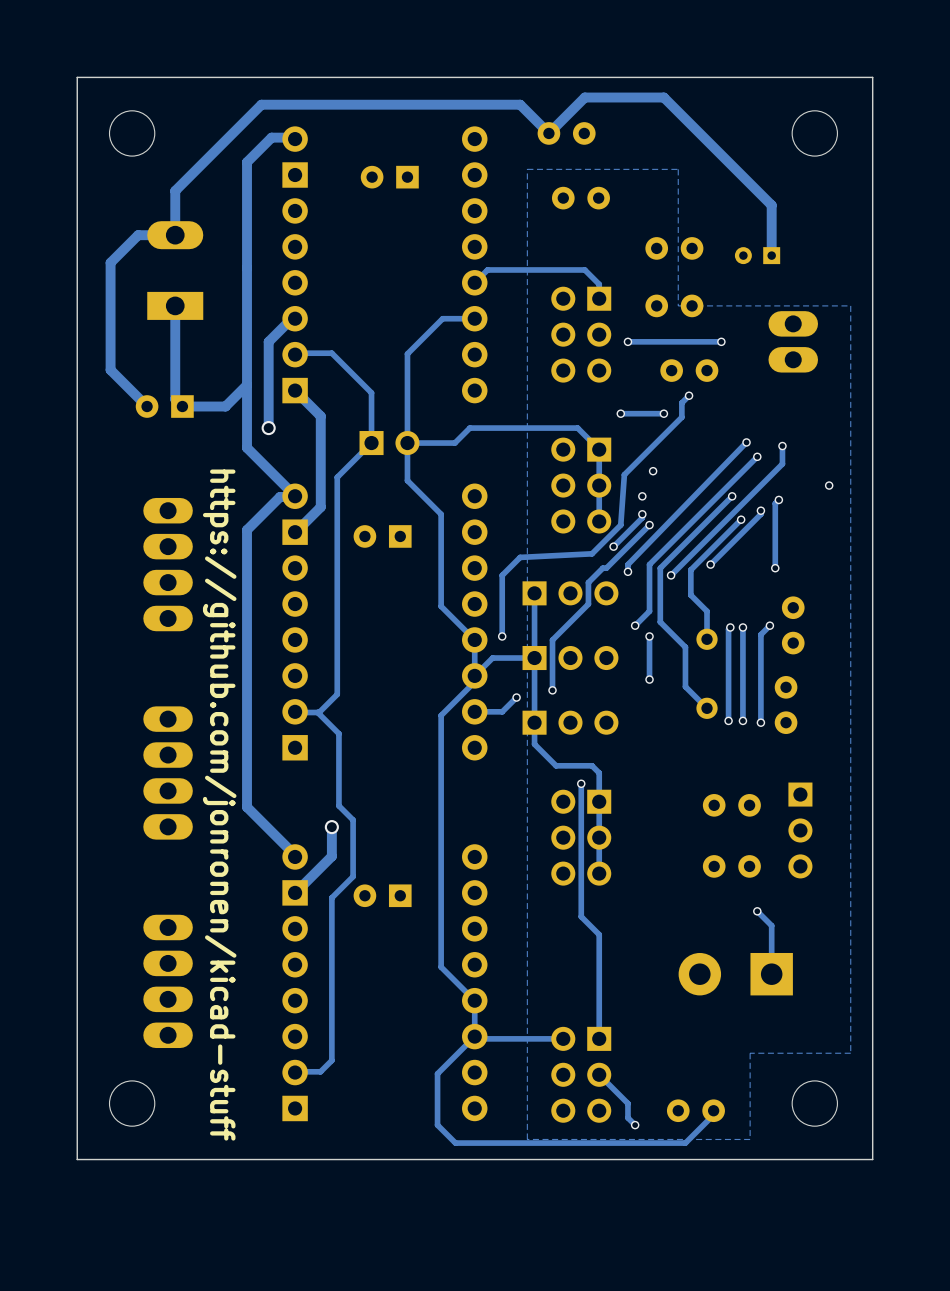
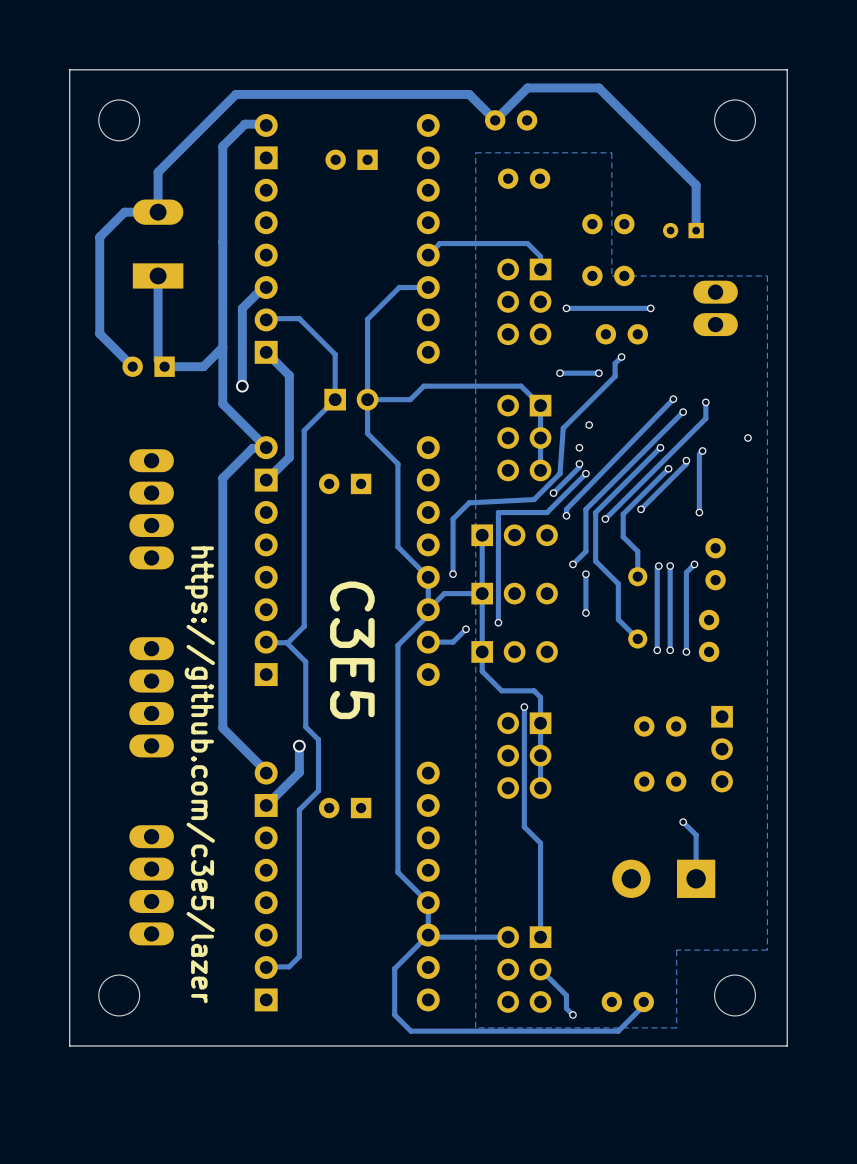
track: (602, 568) (588, 582) (588, 604) (552, 640) -> (543, 512) (498, 512) (498, 577)
text: none -> C3E5 (352, 650)
text: https://github.com/jonronen/kicad-stuff (219, 805) -> none
text: none -> https://github.com/c3e5/lazer (199, 774)

